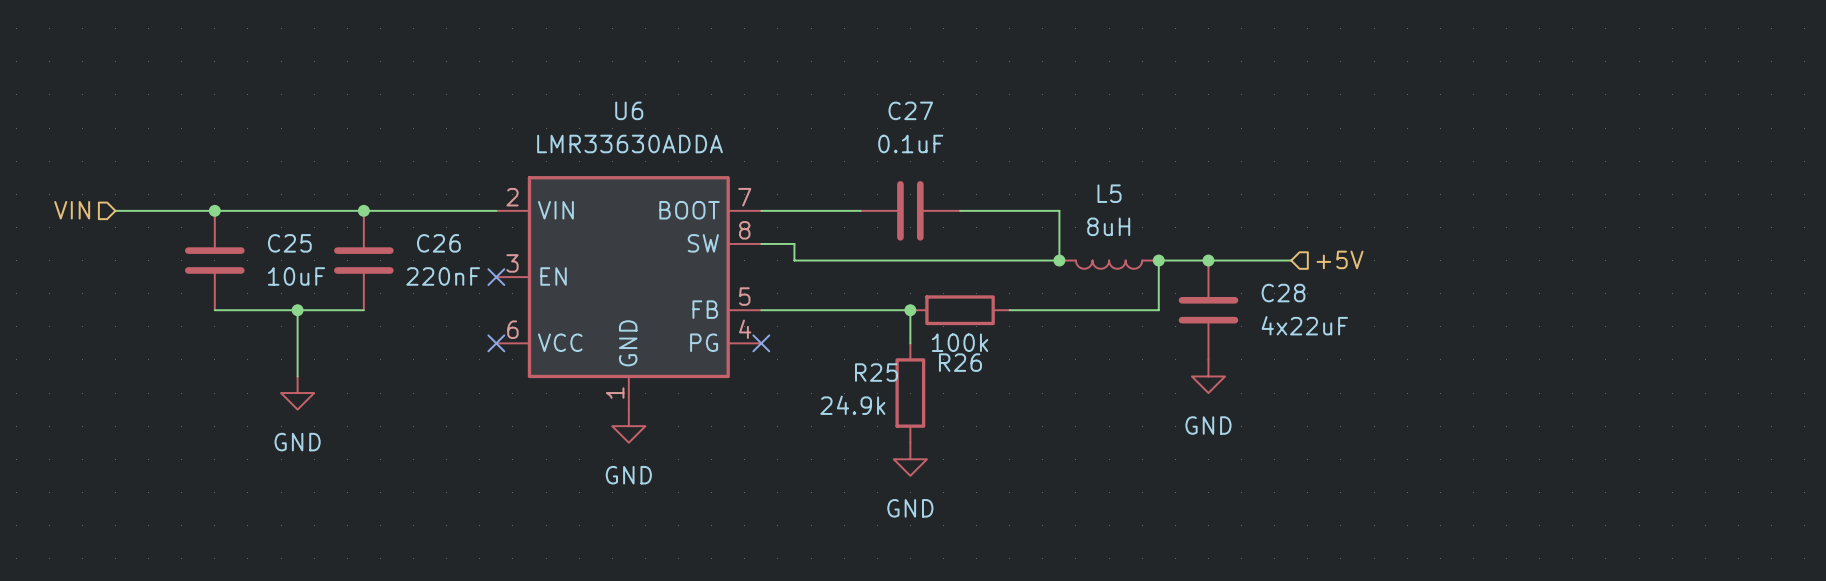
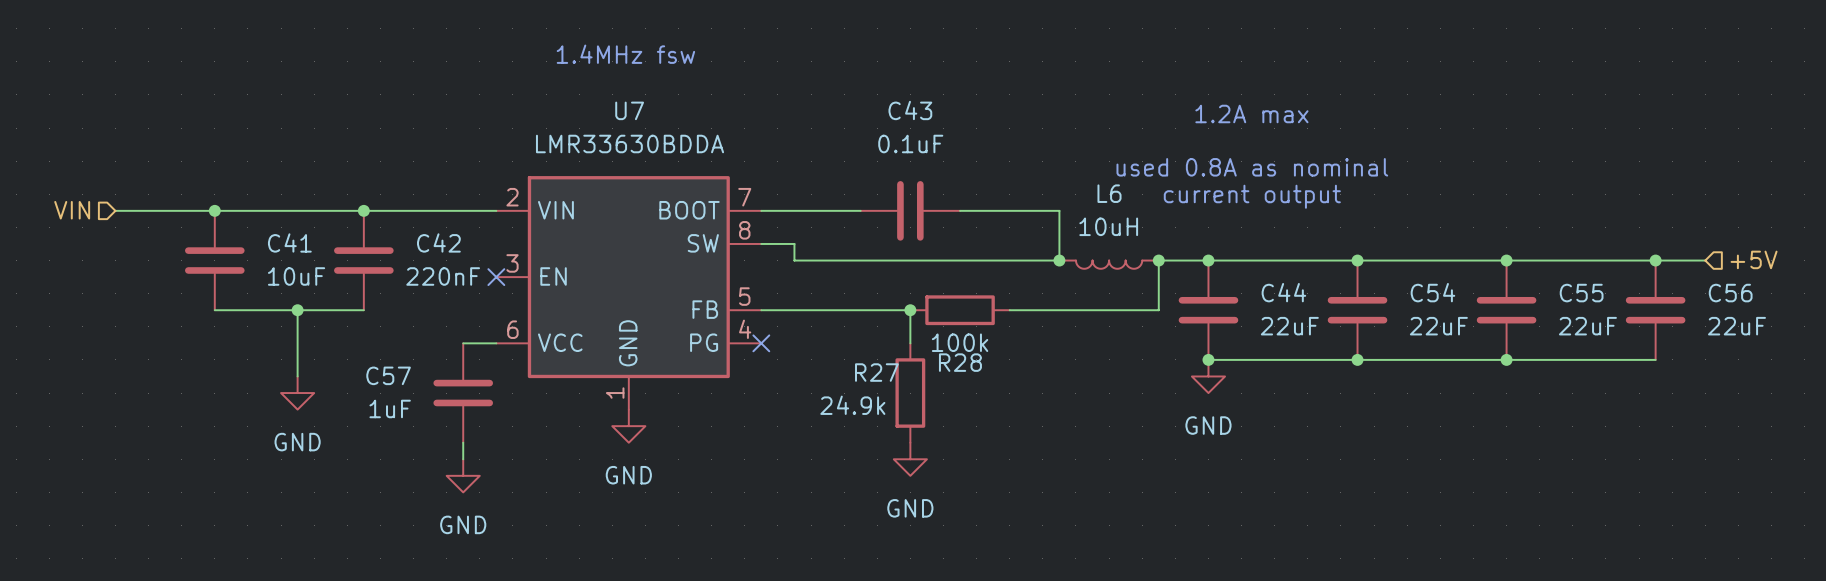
text: none -> 1.4MHz fsw (625, 54)
U6 name: U6 (629, 110) -> U7 (629, 110)
C27 name: C27 (910, 110) -> C43 (910, 110)
text: none -> 1.2A max (1251, 113)
U6 value: LMR33630ADDA (630, 143) -> LMR33630BDDA (630, 143)
text: none -> used 0.8A as nominal (1252, 167)
L5 name: L5 (1109, 193) -> L6 (1109, 193)
text: none -> current output (1252, 196)
L5 value: 8uH (1108, 226) -> 10uH (1108, 226)
C25 name: C25 (289, 243) -> C41 (289, 242)
C26 name: C26 (438, 243) -> C42 (438, 242)
hierarchical label: +5V (1340, 259) -> none
hierarchical label: none -> +5V (1754, 259)
wire: none -> (1291, 260) (1705, 260)
junction: none -> (1357, 260)
junction: none -> (1506, 260)
junction: none -> (1655, 260)
C28 name: C28 (1283, 293) -> C44 (1283, 292)
C54: none -> 22uF (1357, 310)
C55: none -> 22uF (1506, 310)
C56: none -> 22uF (1655, 310)
C28 value: 4x22uF (1304, 325) -> 22uF (1289, 326)
wire: none -> (463, 343) (496, 343)
no-connect mark: (496, 343) -> none
wire: none -> (1208, 359) (1655, 359)
junction: none -> (1208, 359)
junction: none -> (1357, 359)
junction: none -> (1506, 359)
R26 name: R26 (960, 362) -> R28 (960, 362)
R25 name: R25 (876, 372) -> R27 (876, 372)
C57: none -> 1uF (463, 393)
wire: none -> (463, 442) (463, 459)
power symbol: none -> GND (463, 475)

